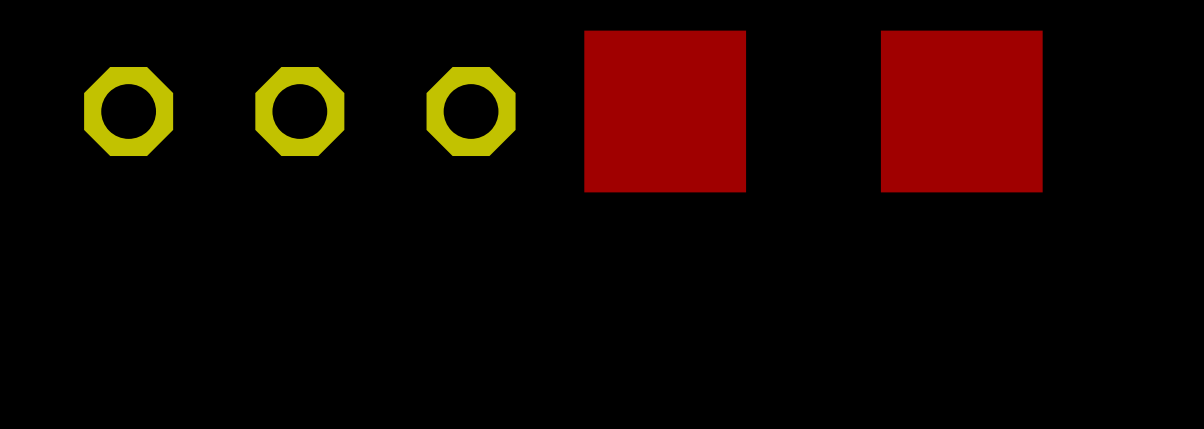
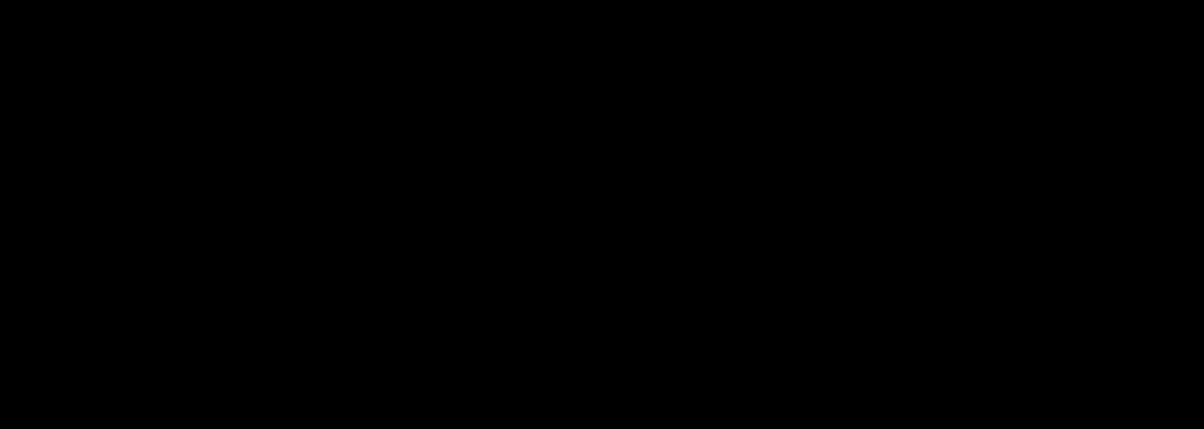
part: (299, 111) -> none
part: (813, 111) -> none

